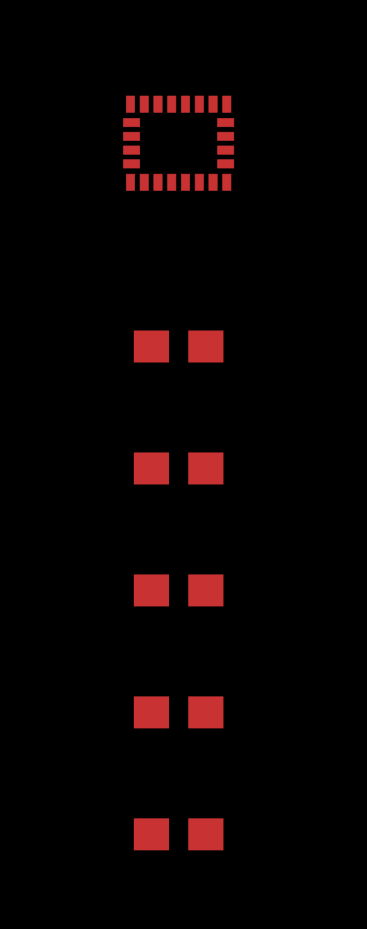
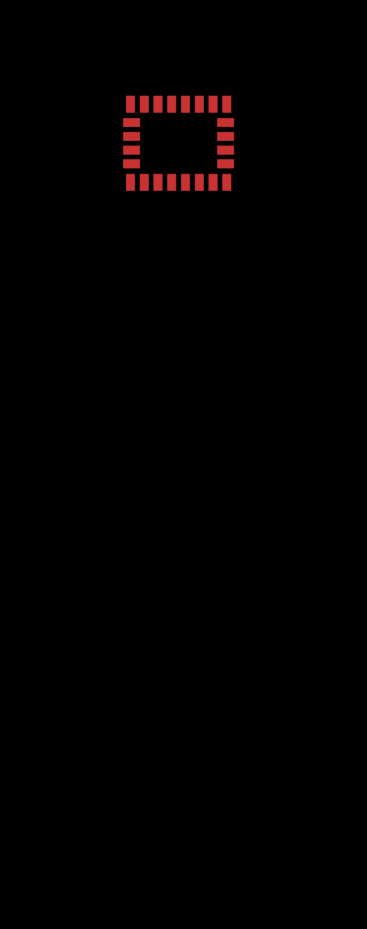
part: (178, 346) -> none
part: (178, 468) -> none
part: (178, 590) -> none
part: (178, 712) -> none
part: (178, 834) -> none

